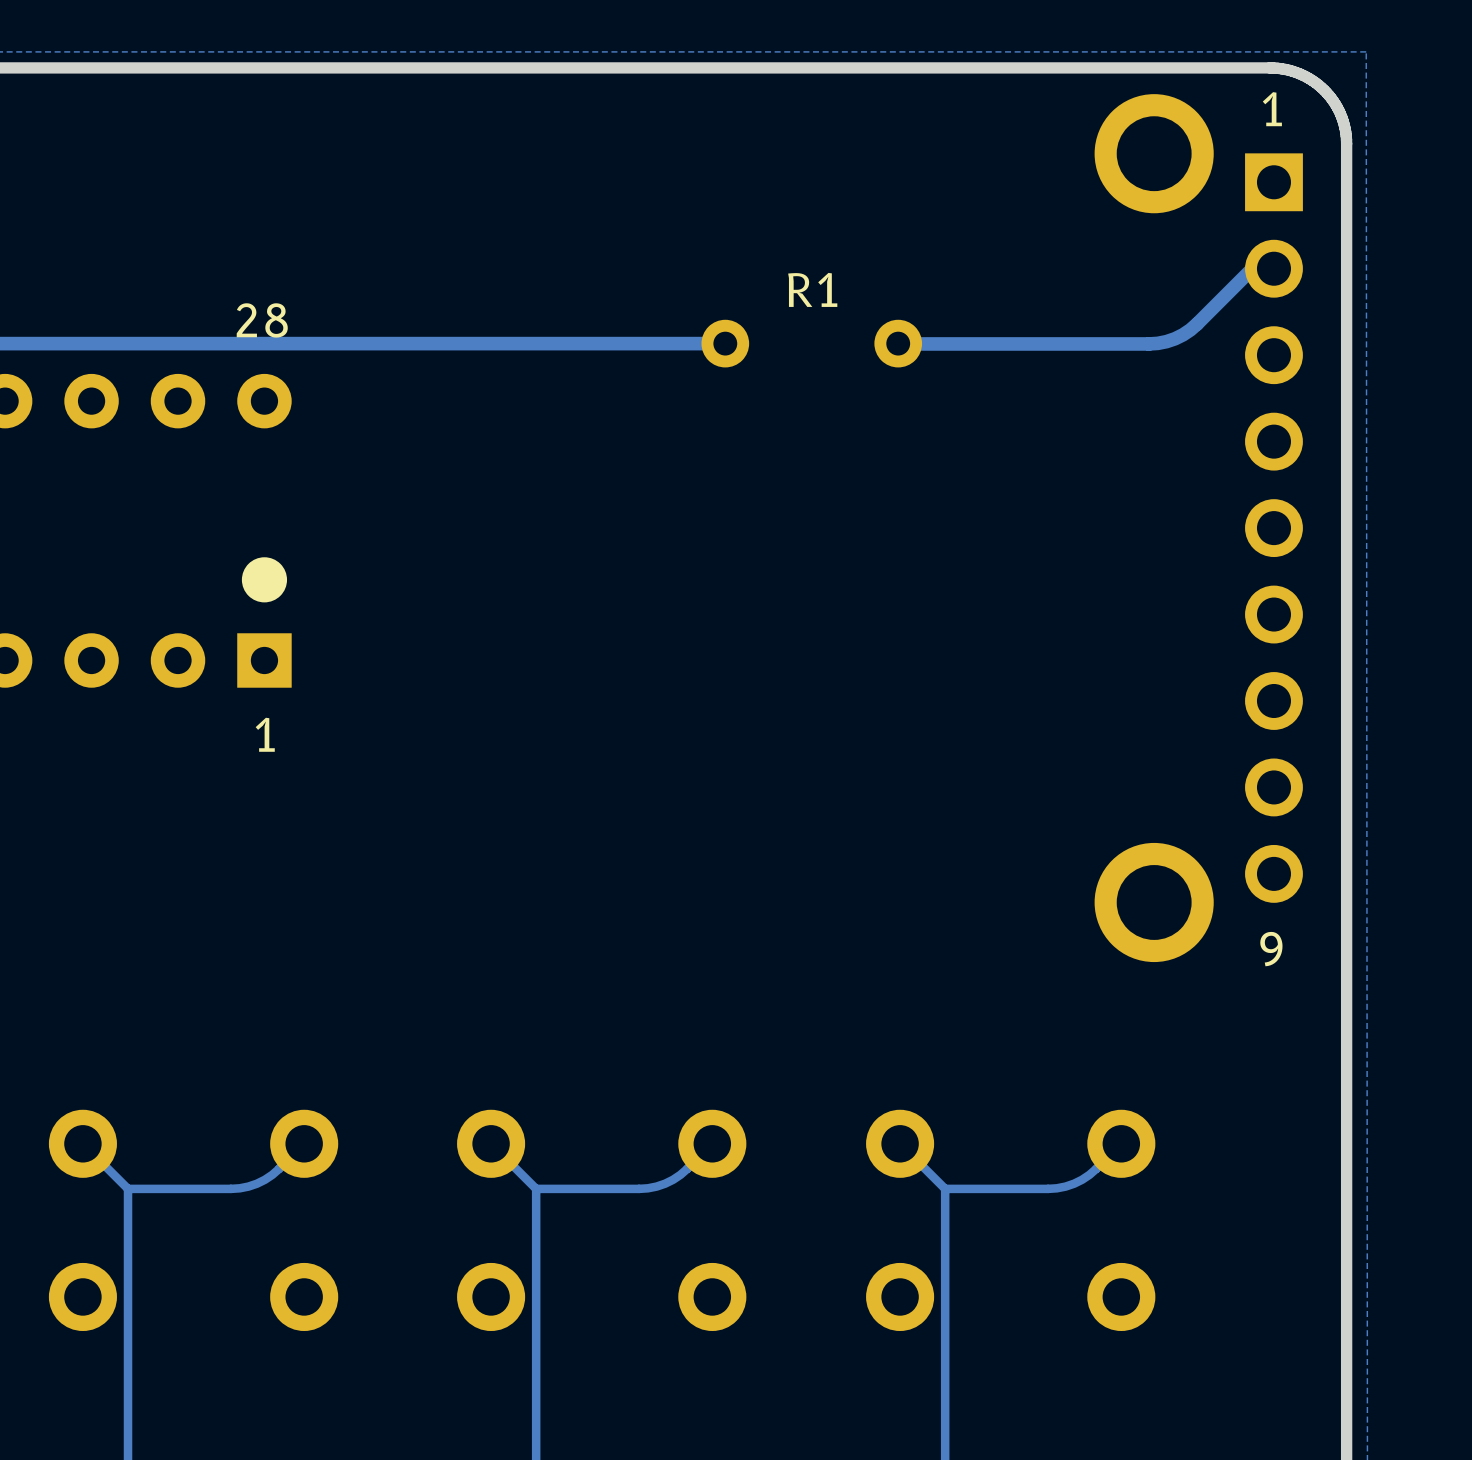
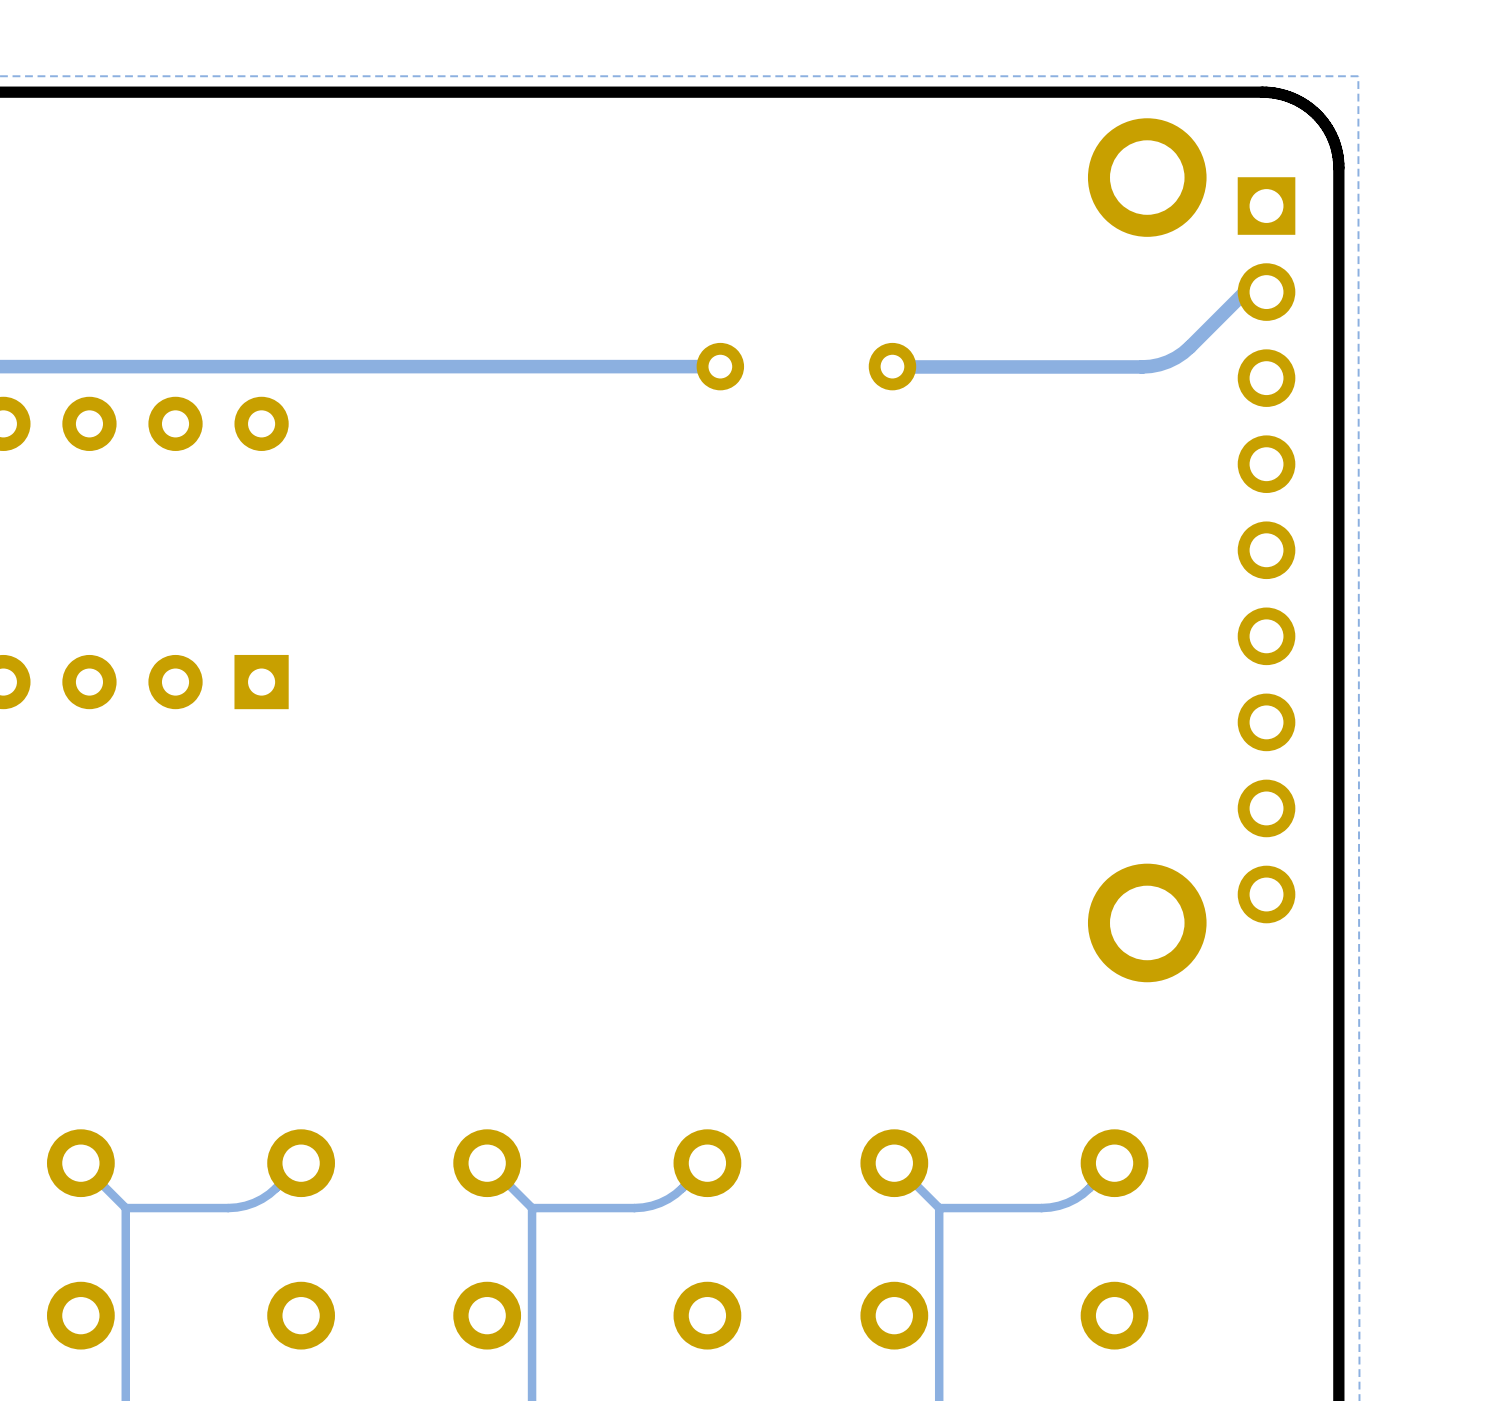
text: 1 (1272, 109) -> none
text: R1 (812, 289) -> none
text: 28 (262, 320) -> none
drawing: [241, 557, 288, 603] -> none
text: 1 (265, 734) -> none
text: 9 (1271, 949) -> none

